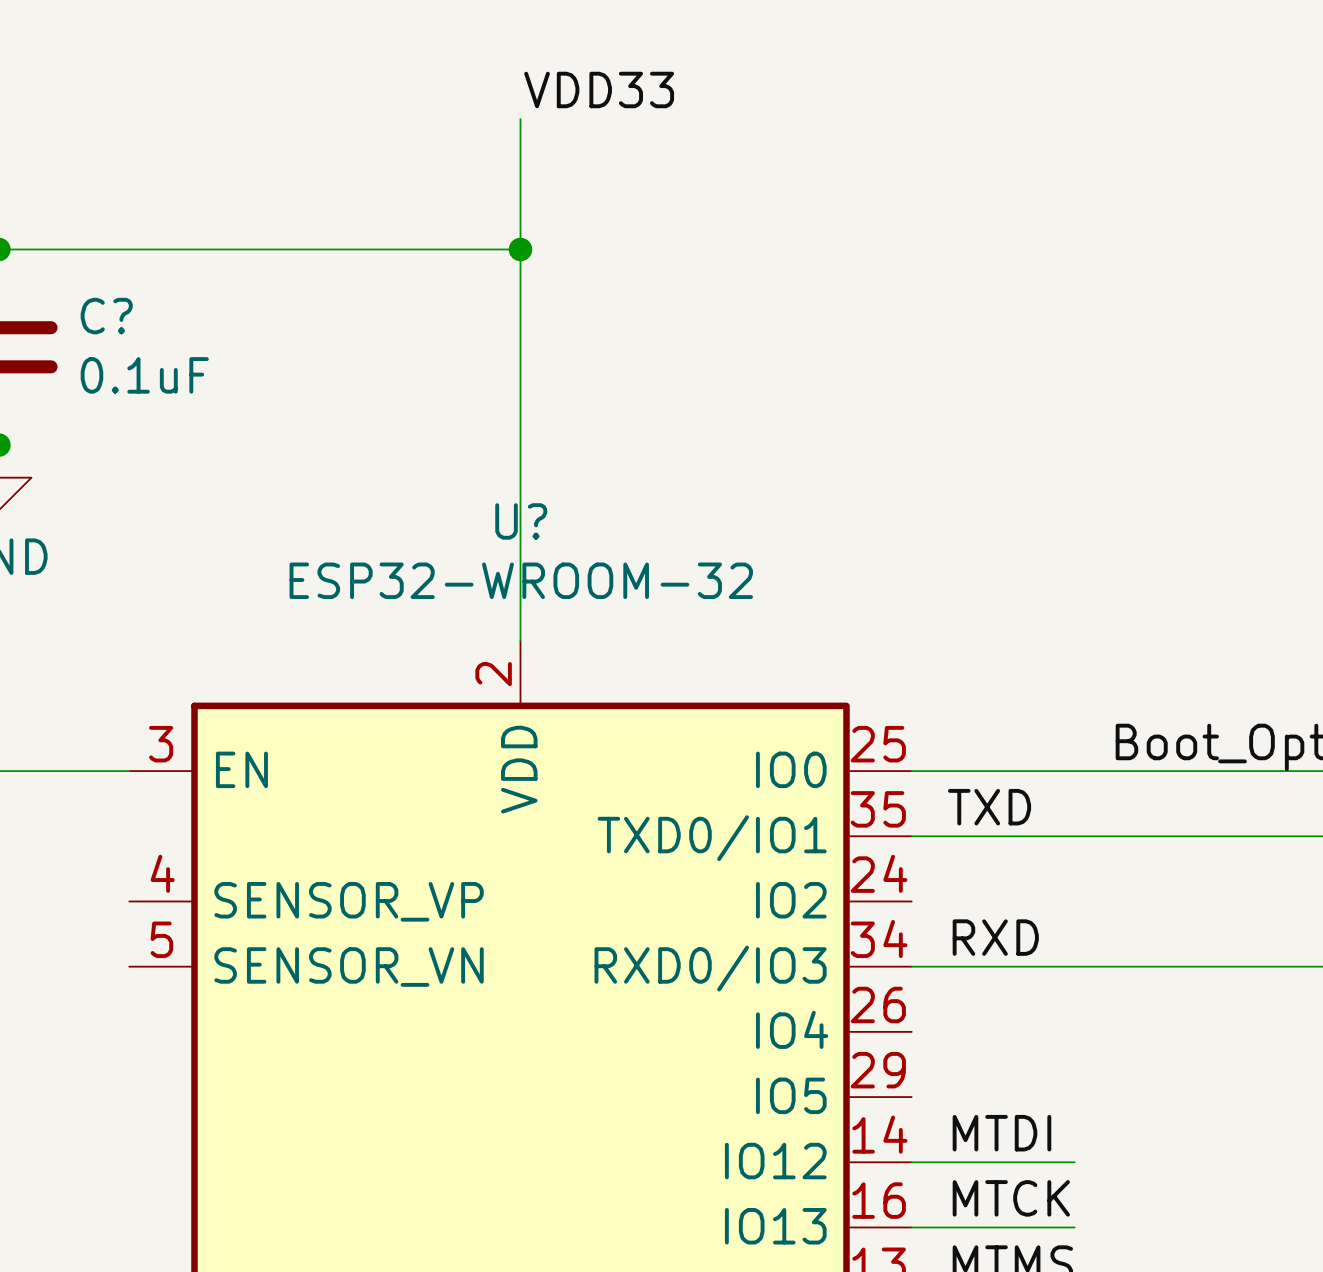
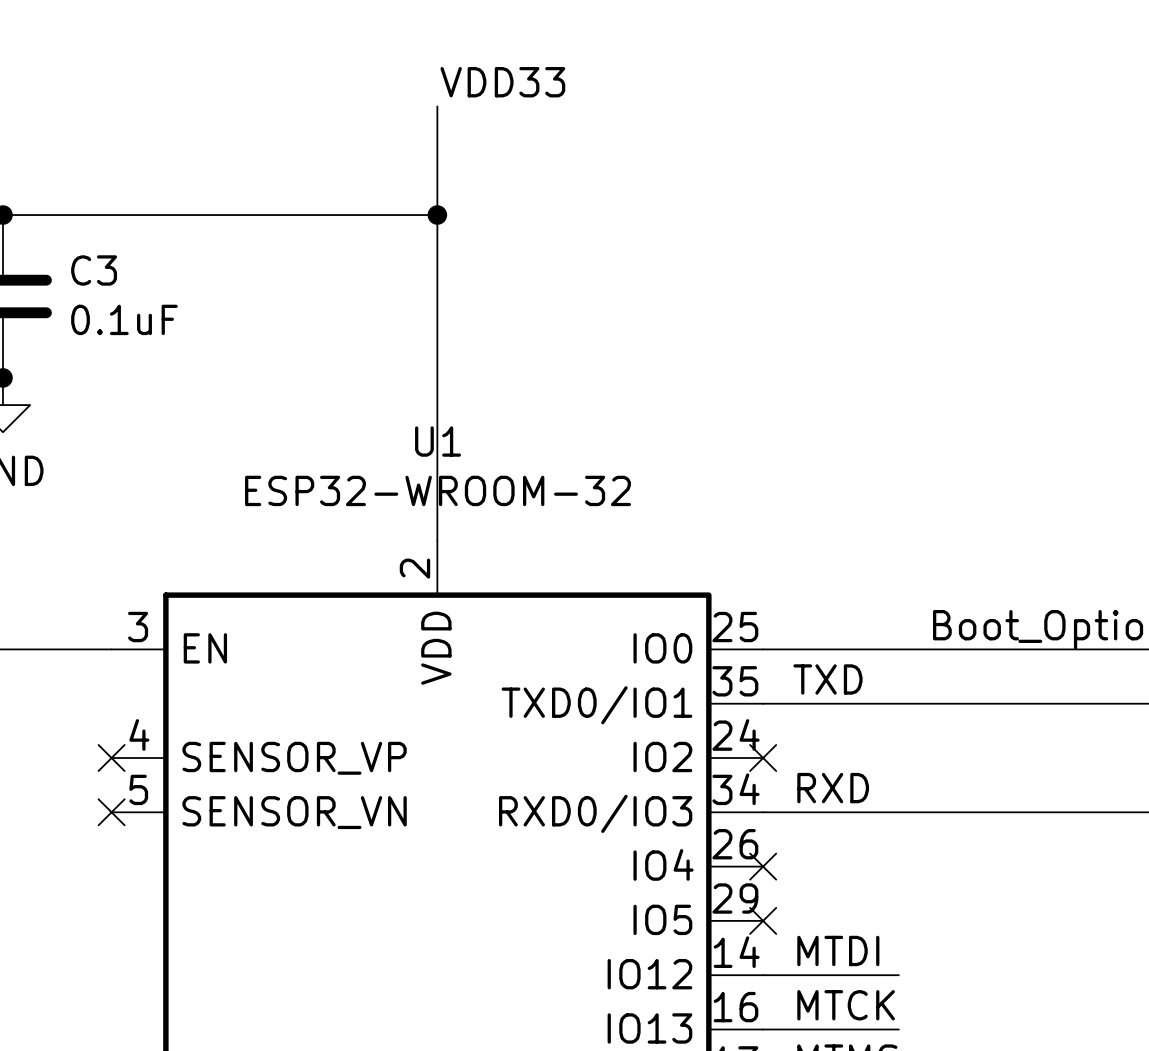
C? name: C? (106, 316) -> C3 (94, 270)
U? name: U? (521, 521) -> U1 (438, 441)
no-connect mark: none -> (111, 758)
no-connect mark: none -> (763, 758)
no-connect mark: none -> (111, 812)
no-connect mark: none -> (763, 866)
no-connect mark: none -> (763, 920)

